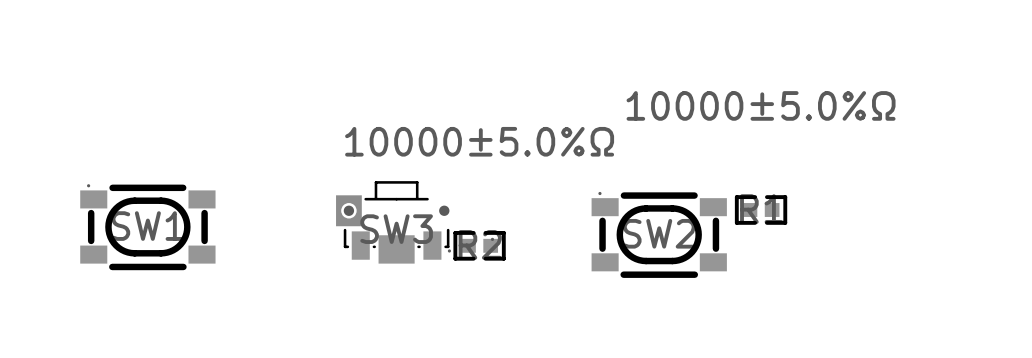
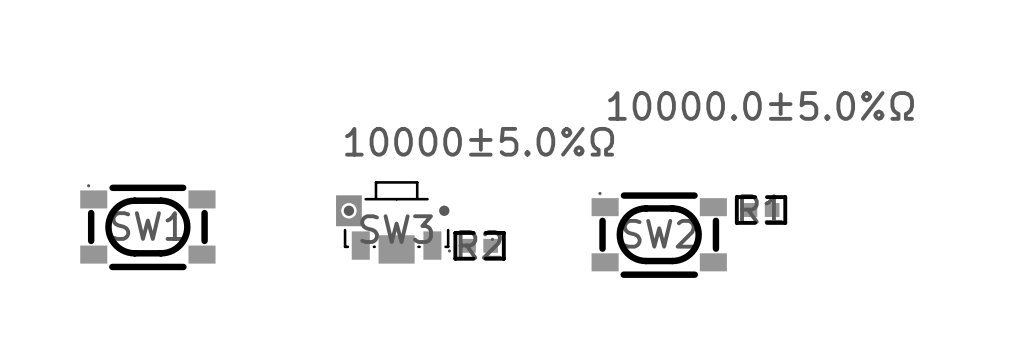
part value: 10000±5.0%Ω (761, 105) -> 10000.0±5.0%Ω (761, 105)

